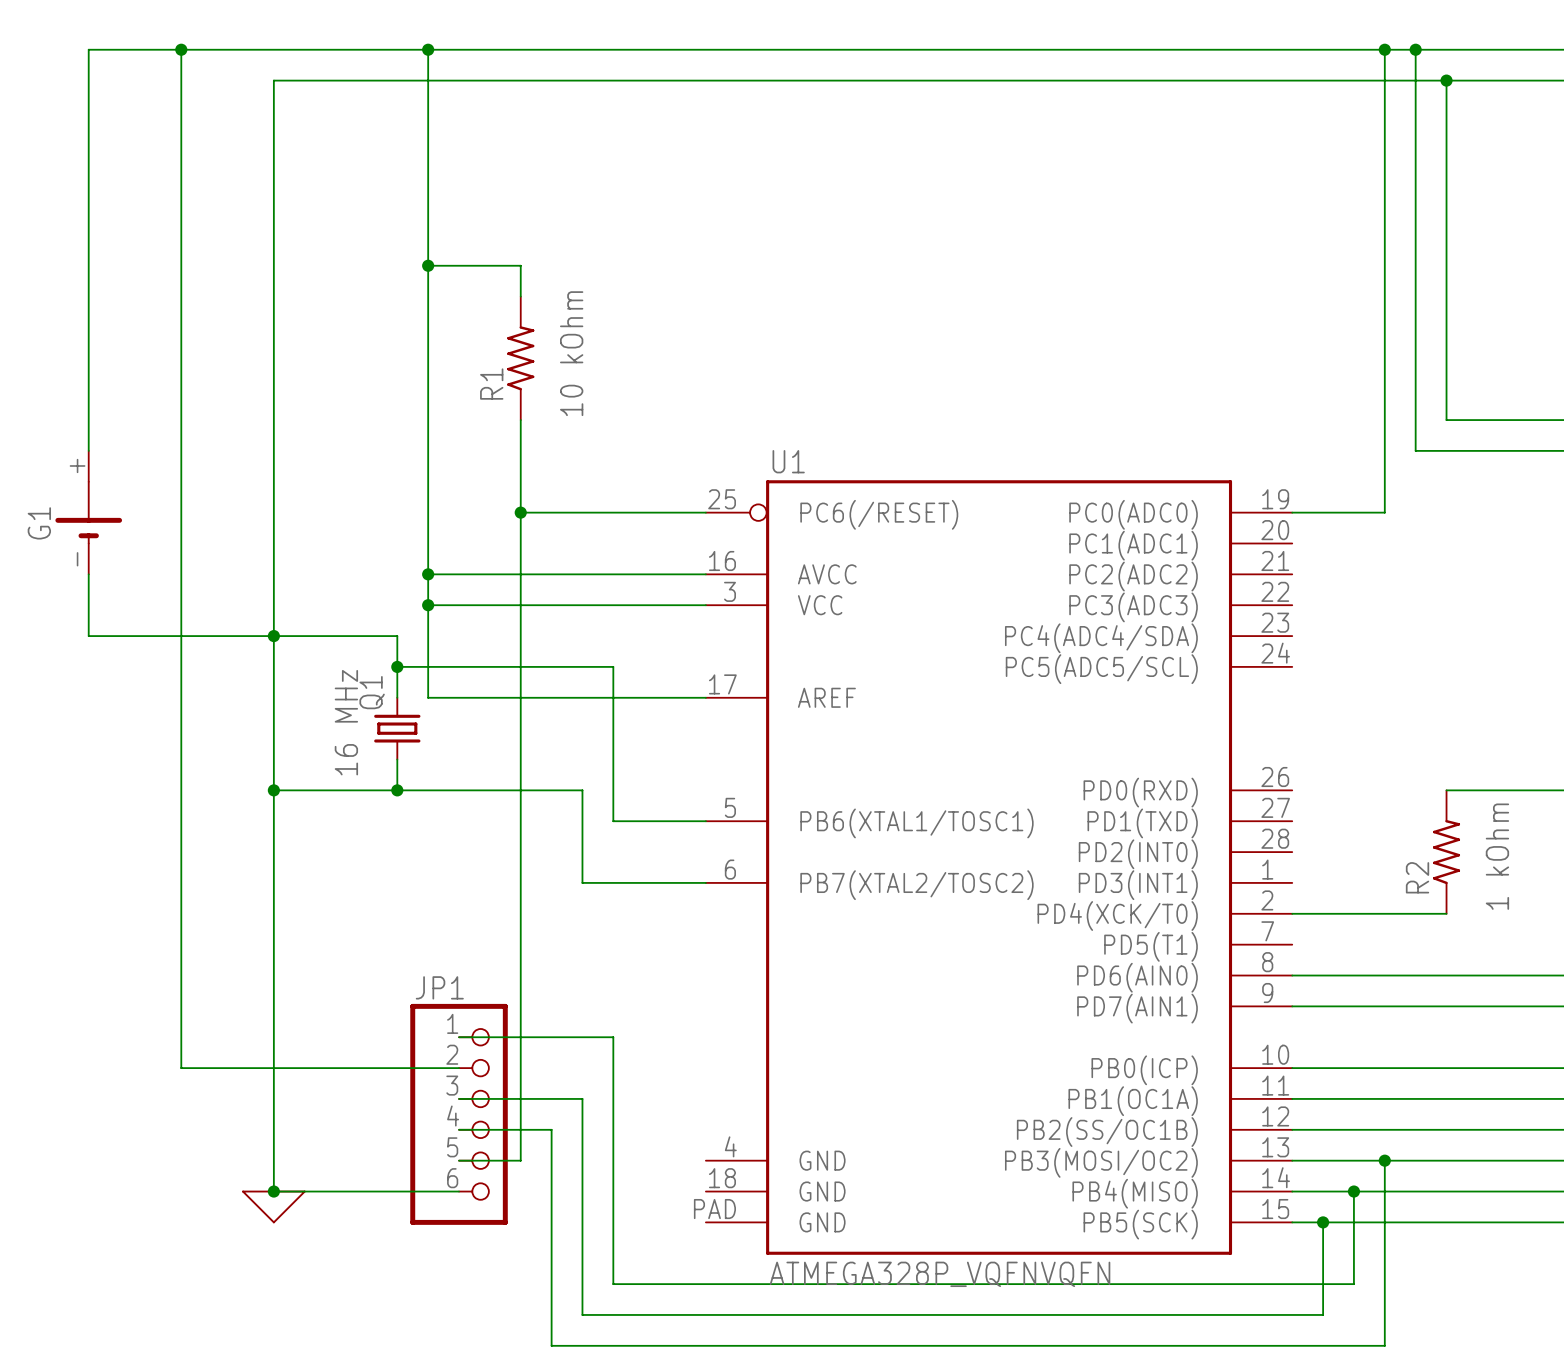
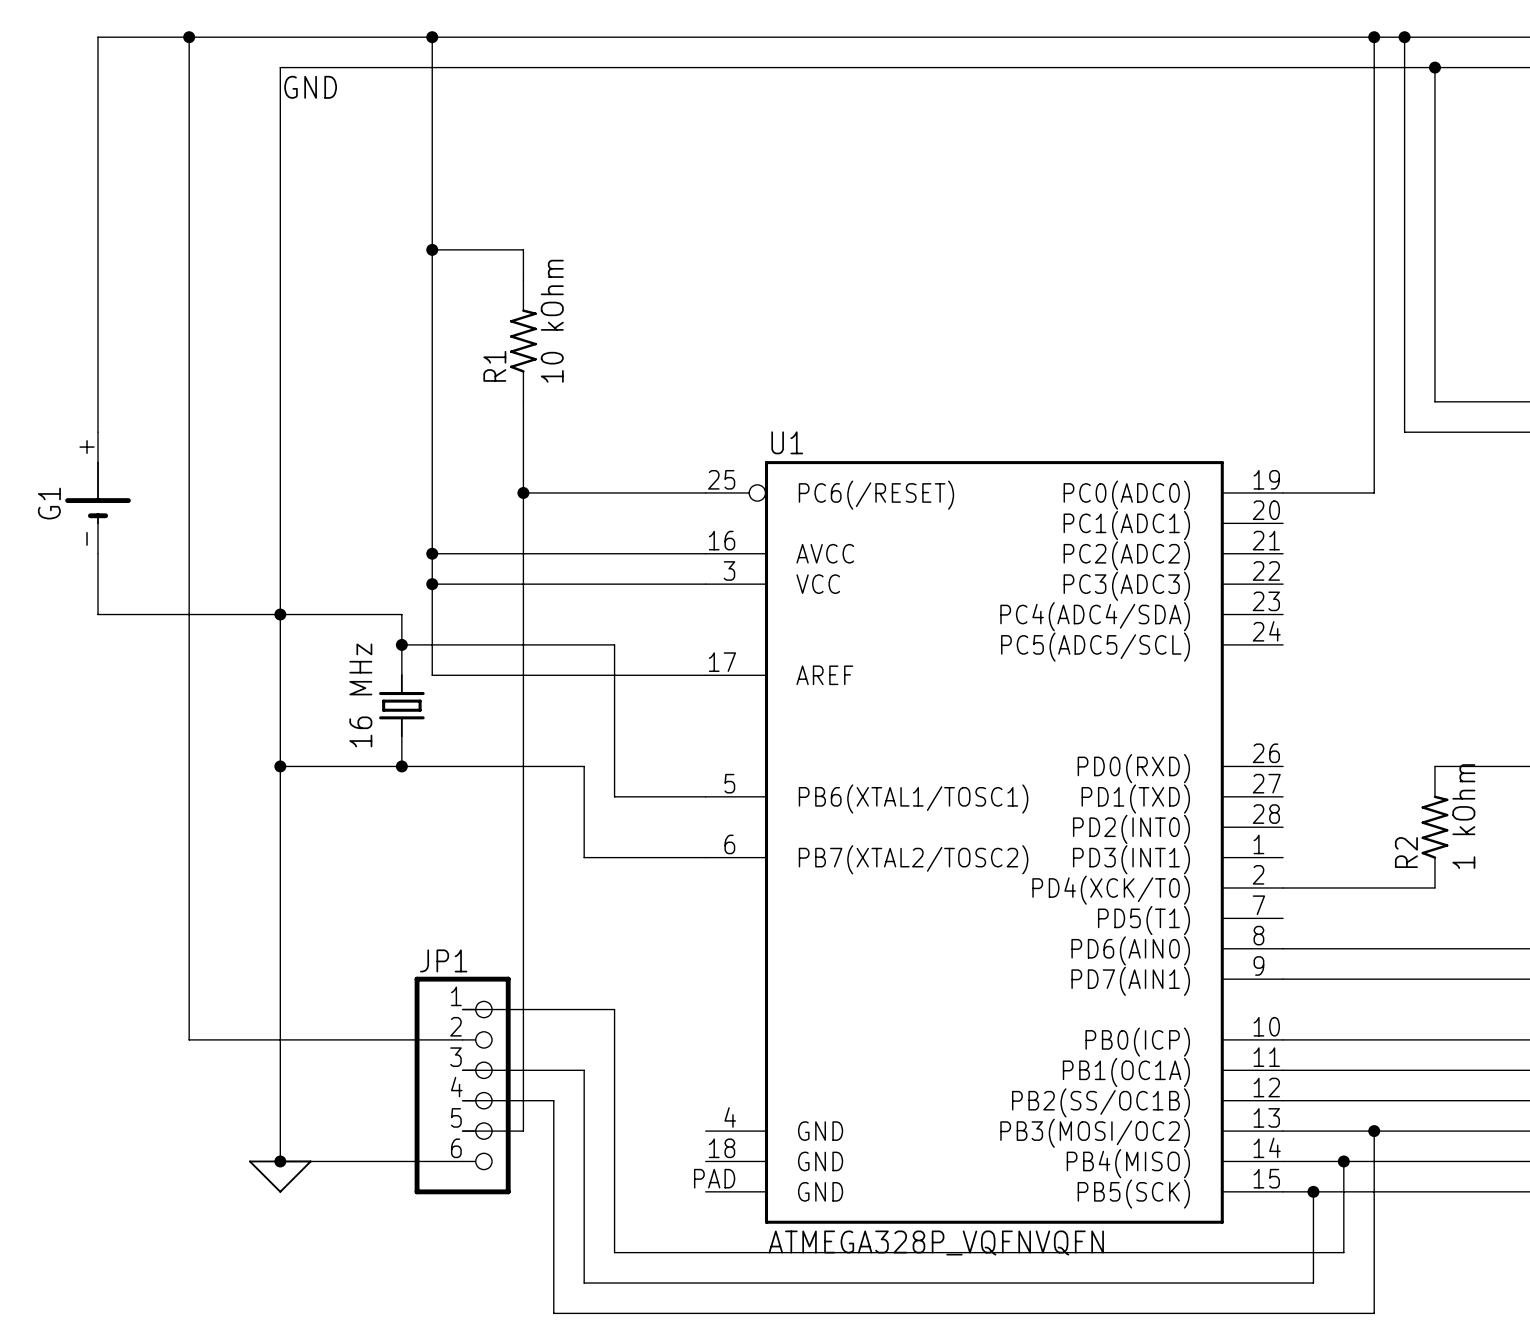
label: none -> GND (310, 87)
R1 value: none -> 10 kOhm (552, 321)
R1 text: 10 kOhm (571, 353) -> none
Q1 name: Q1 (372, 692) -> none
Q1 value: none -> 16 MHz (360, 695)
Q1 text: 16 MHz (346, 722) -> none
R2 value: none -> 1 kOhm (1463, 816)
R2 text: 1 kOhm (1497, 856) -> none

